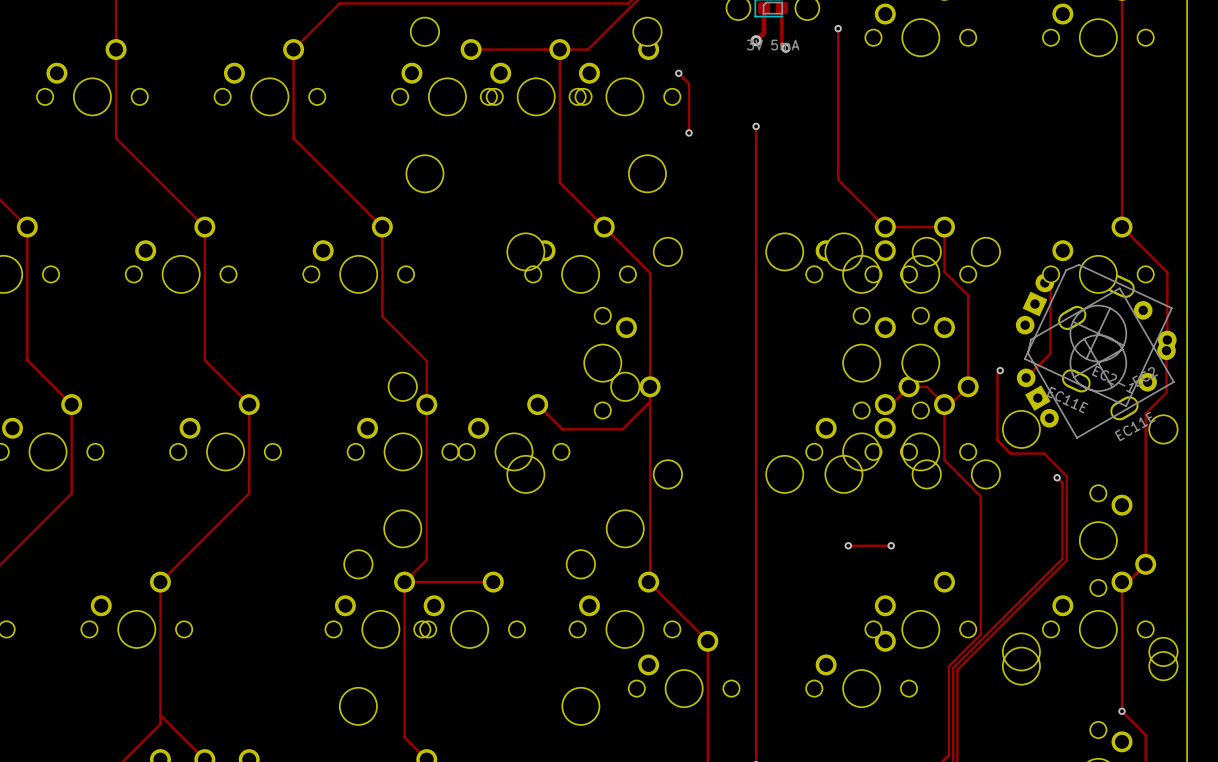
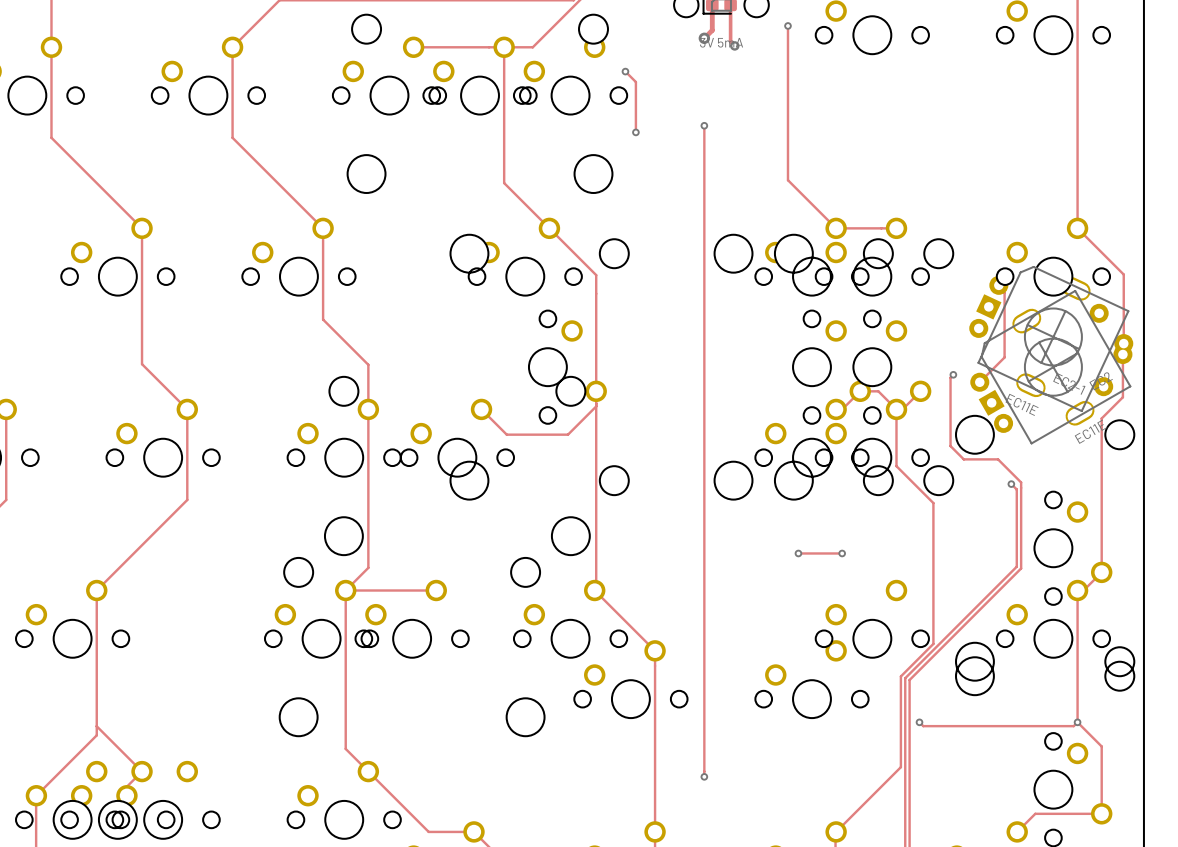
track: (944, 227) (944, 271) (968, 295) (968, 386) -> none
track: none -> (919, 722) (923, 726) (1073, 726) (1077, 722)
via: none -> (919, 722)

